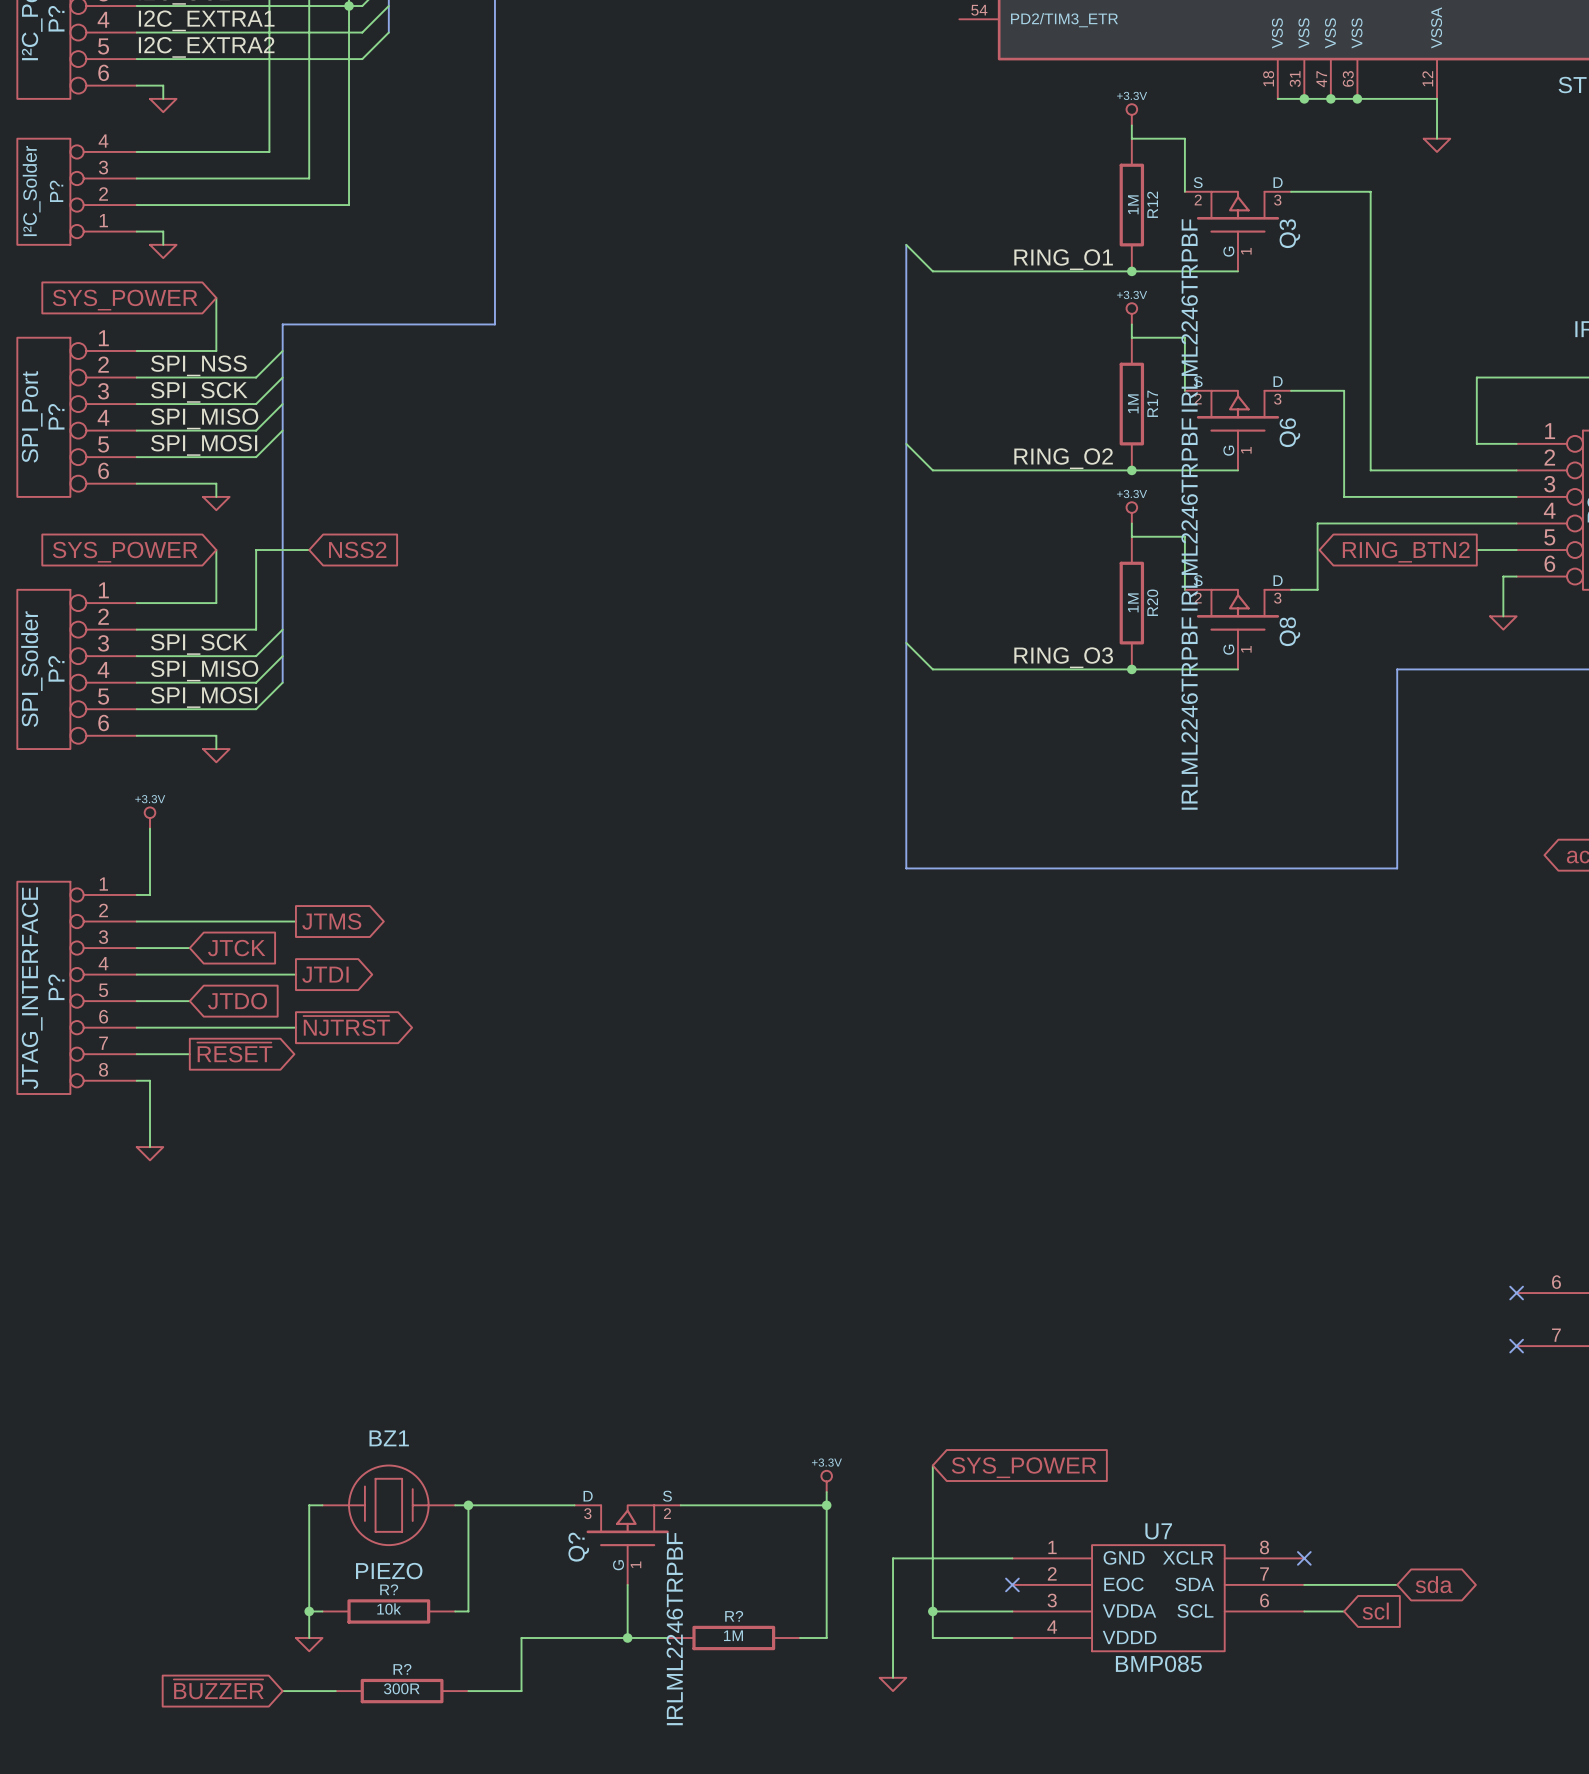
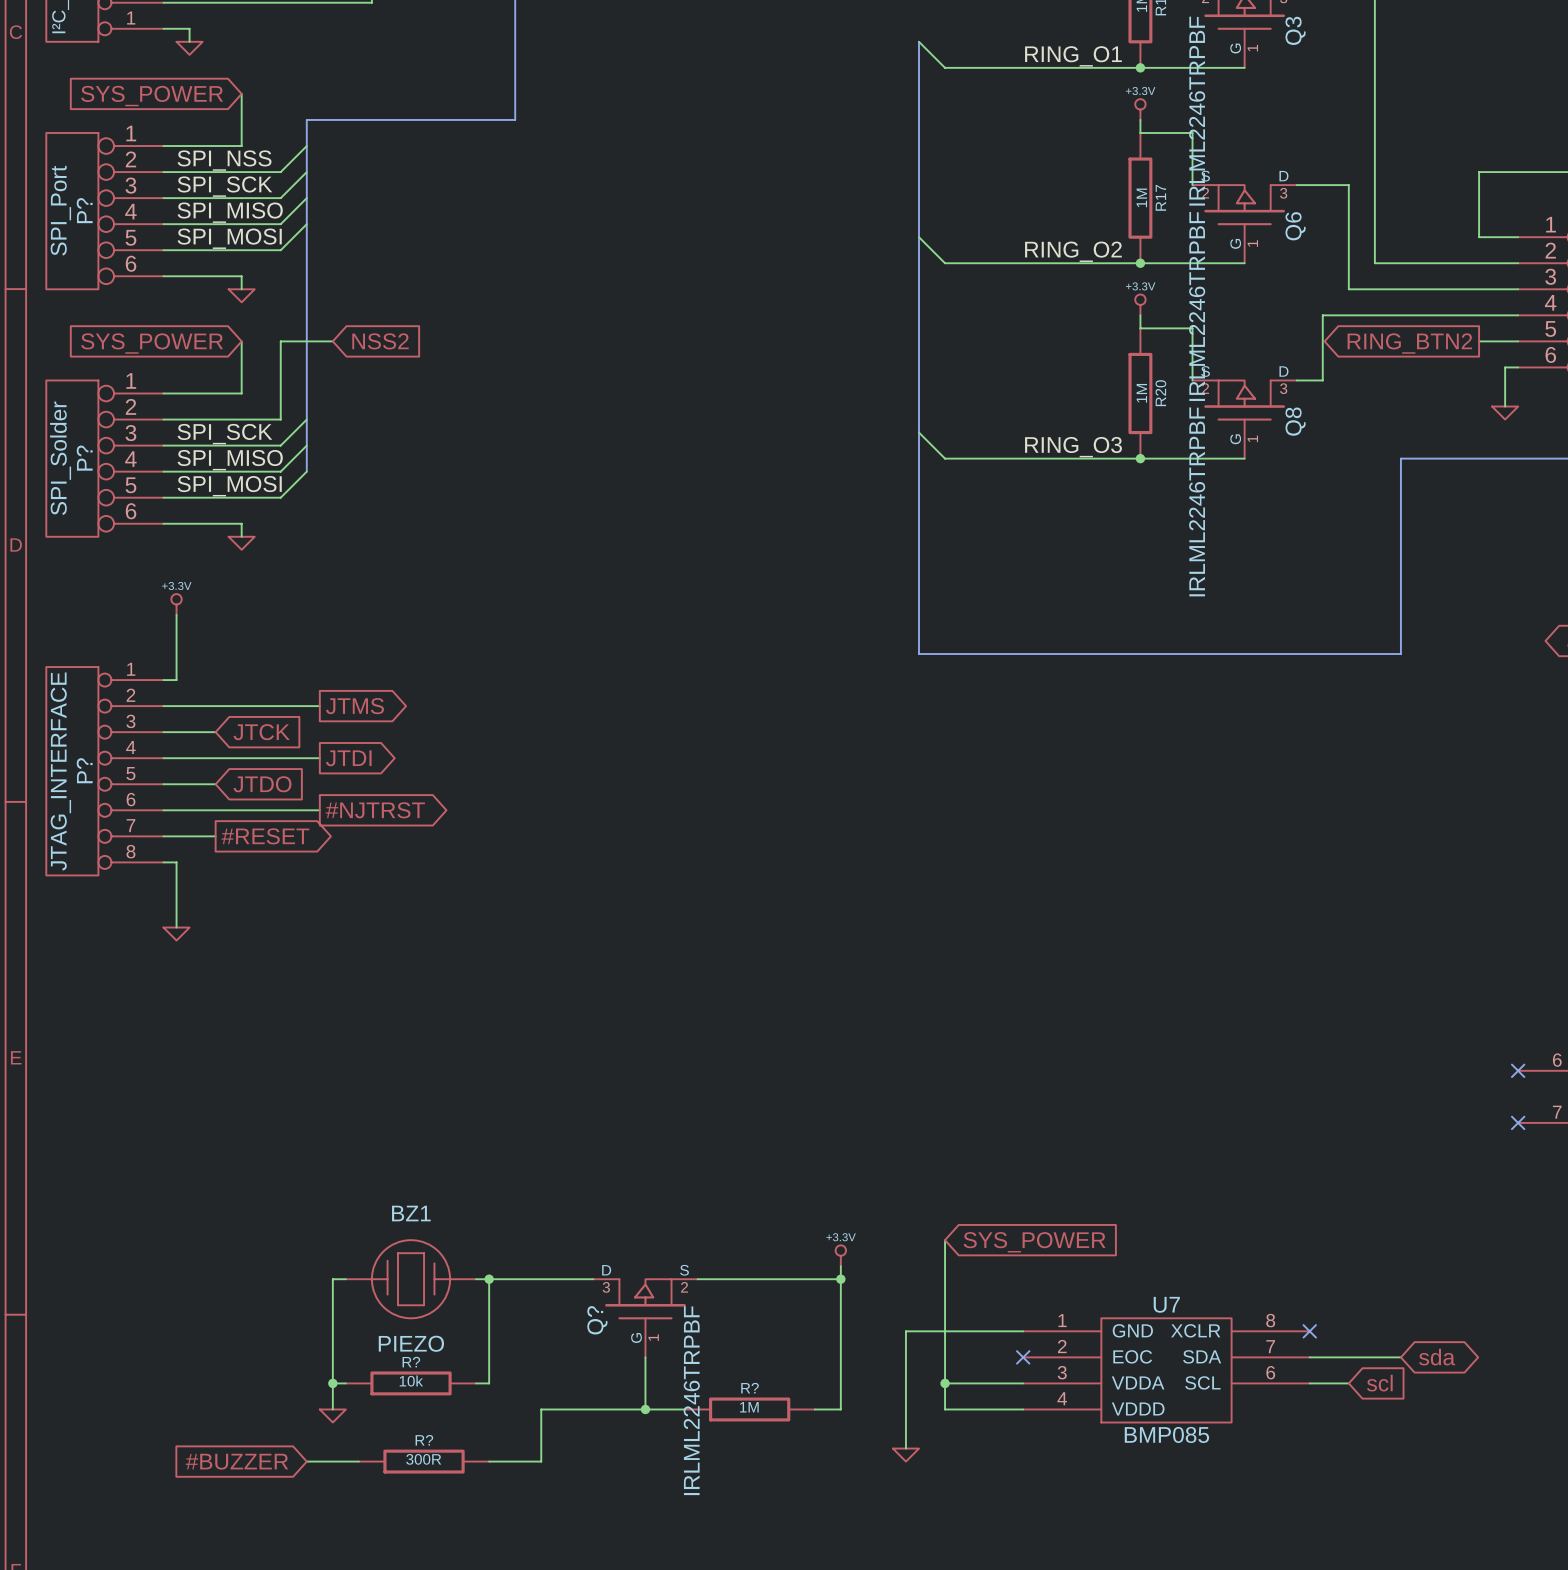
global label: ~{NJTRST} (346, 1025) -> #NJTRST (375, 810)
global label: ~{RESET} (234, 1052) -> #RESET (265, 836)
global label: ~{BUZZER} (218, 1689) -> #BUZZER (236, 1461)

